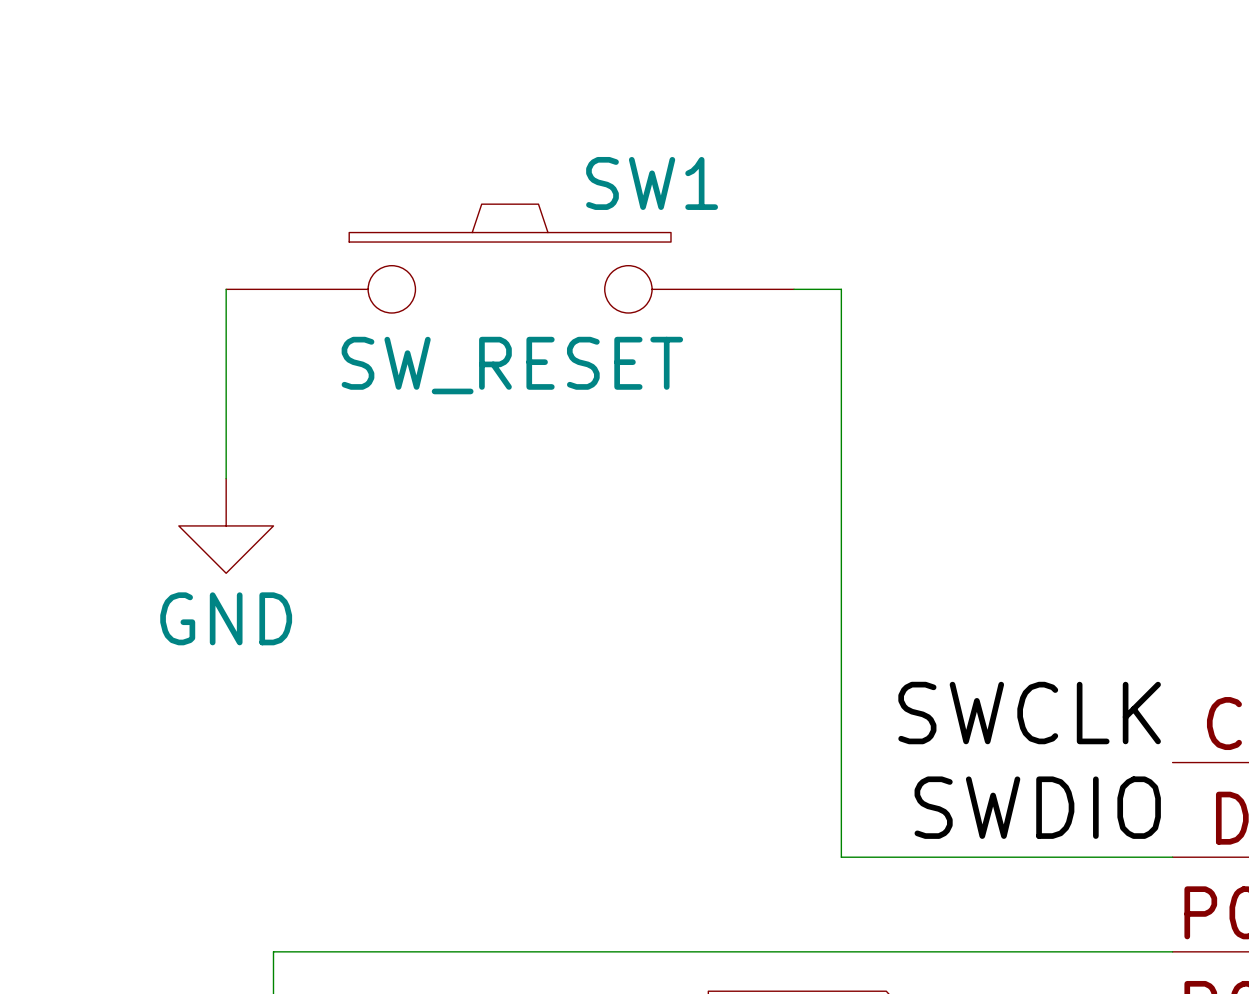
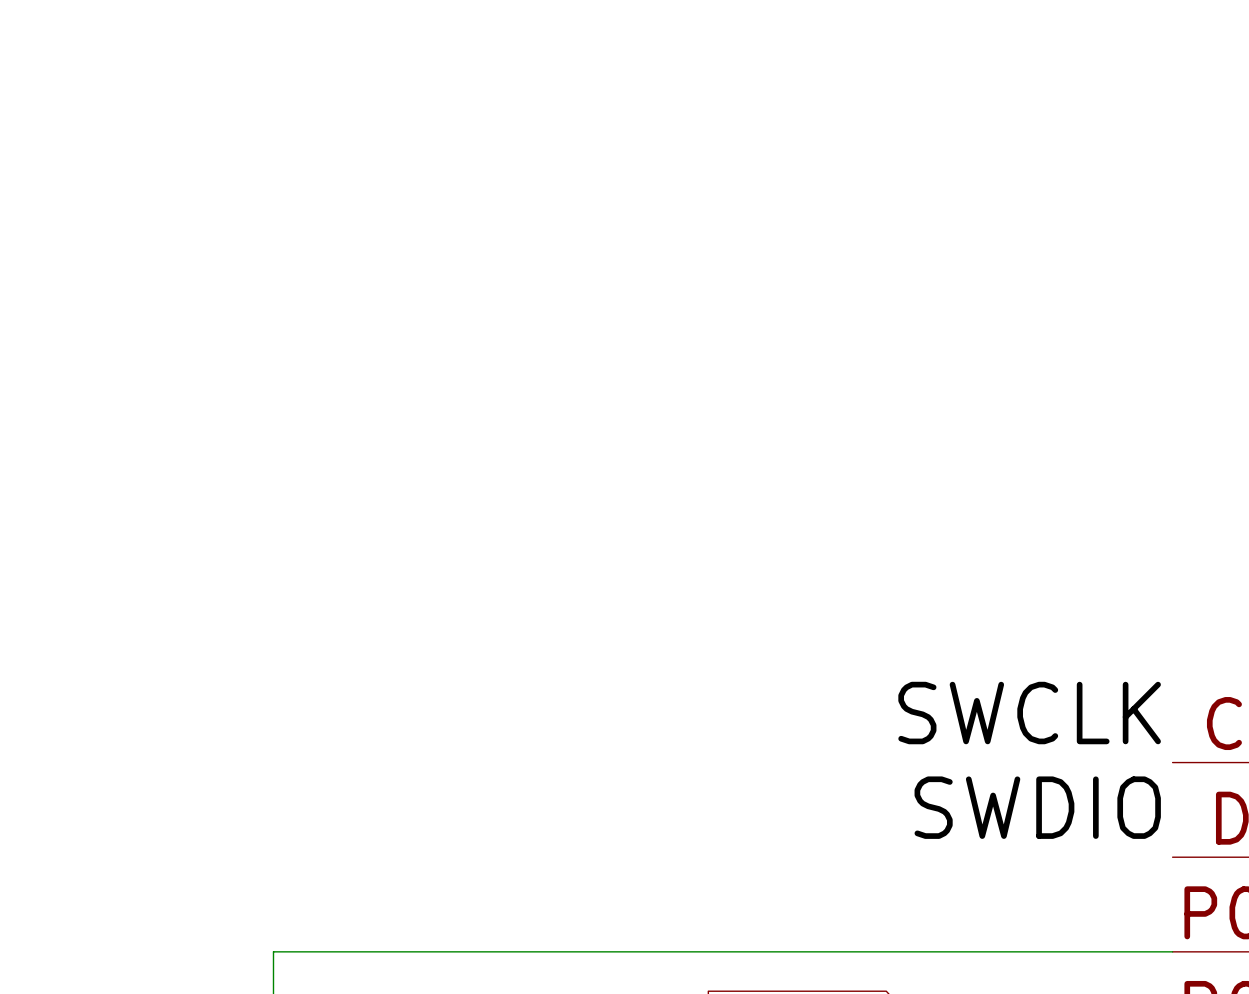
SW1: SW_RESET (510, 258) -> none
wire: (226, 289) (226, 478) -> none
wire: (794, 289) (841, 289) (841, 857) (1172, 857) -> none
power symbol: GND (226, 525) -> none

